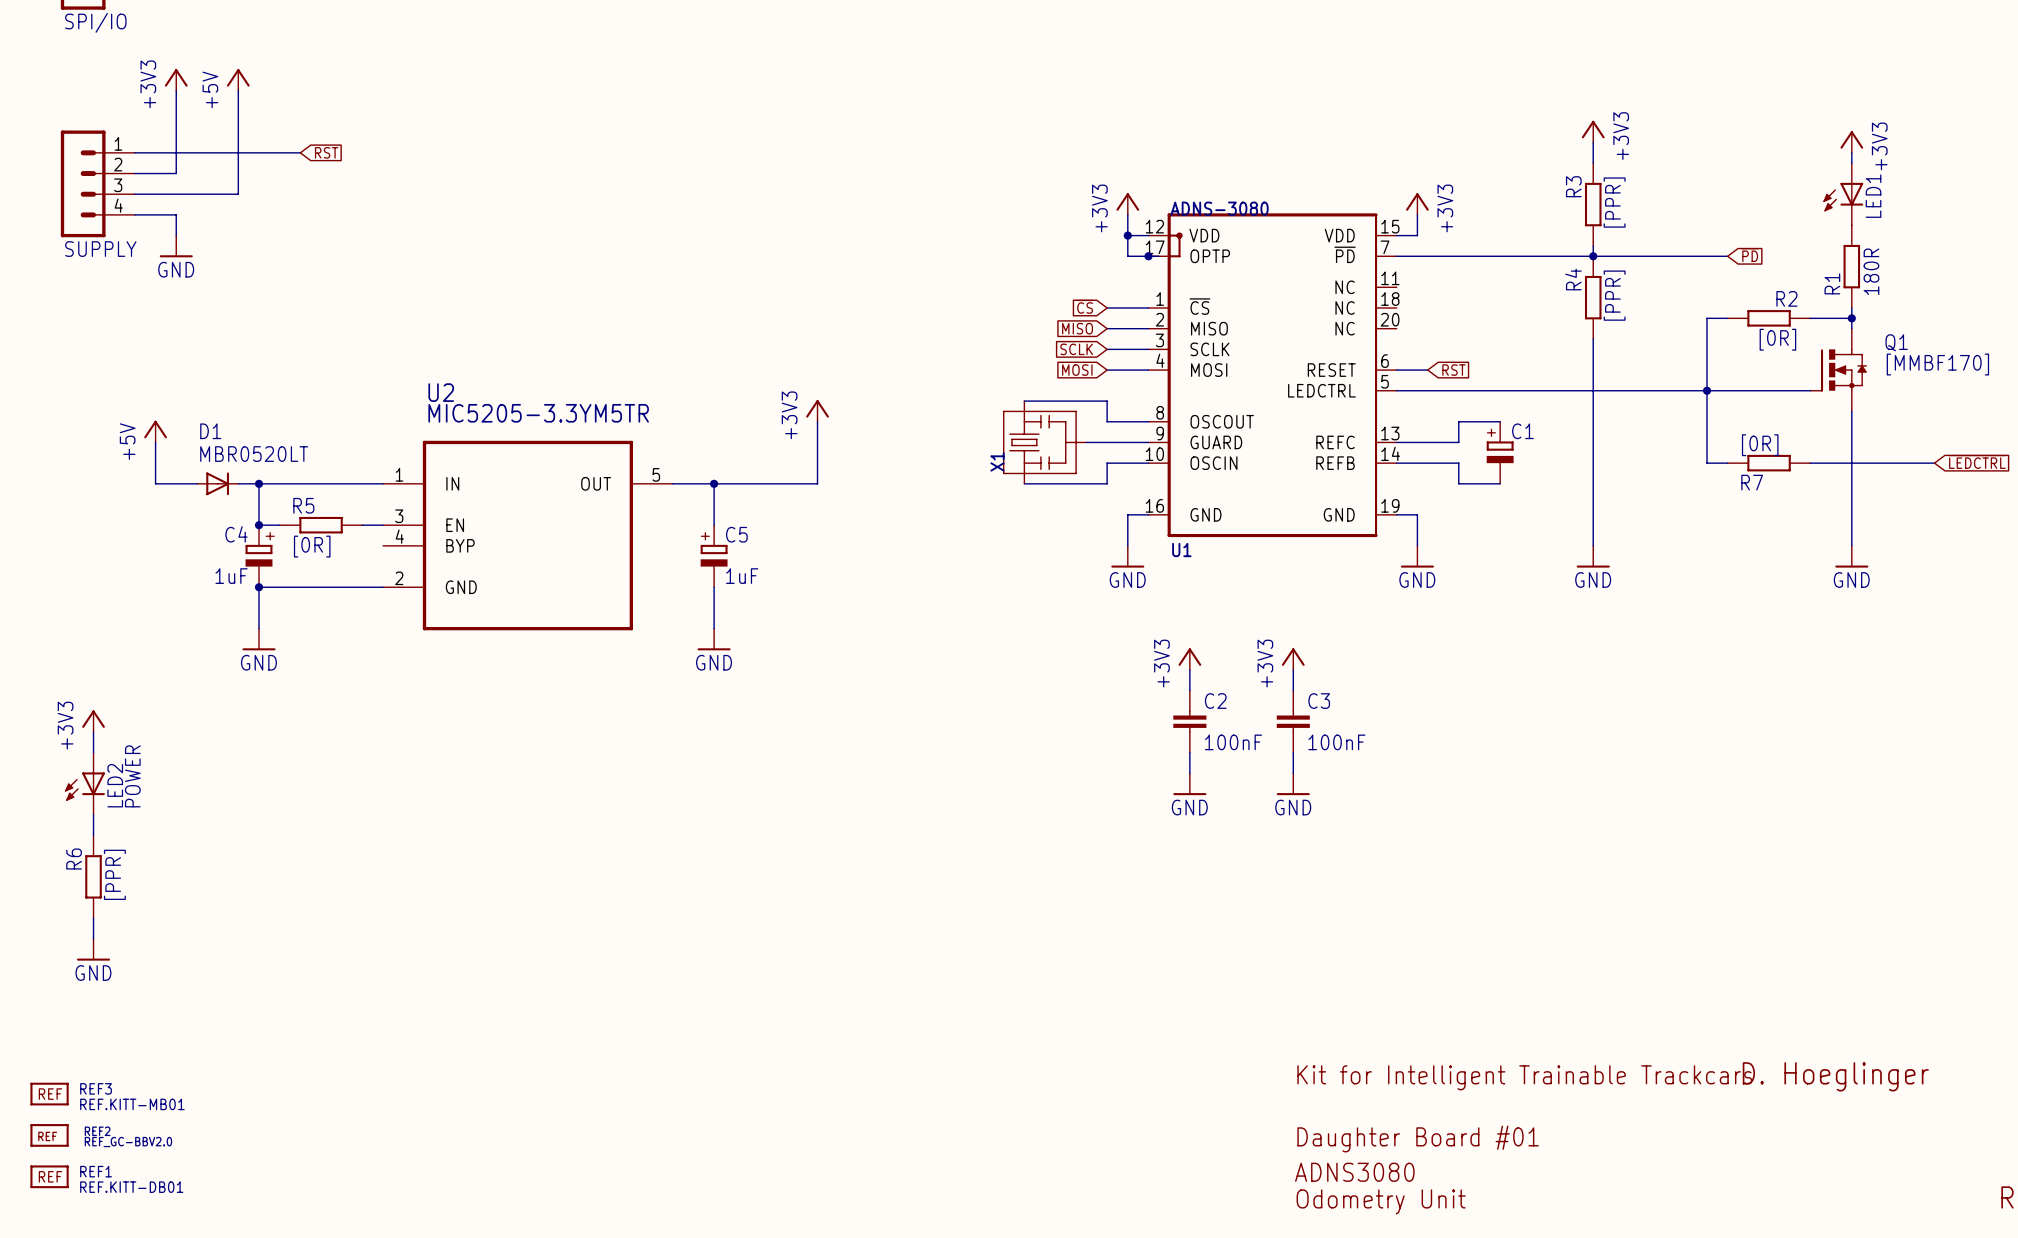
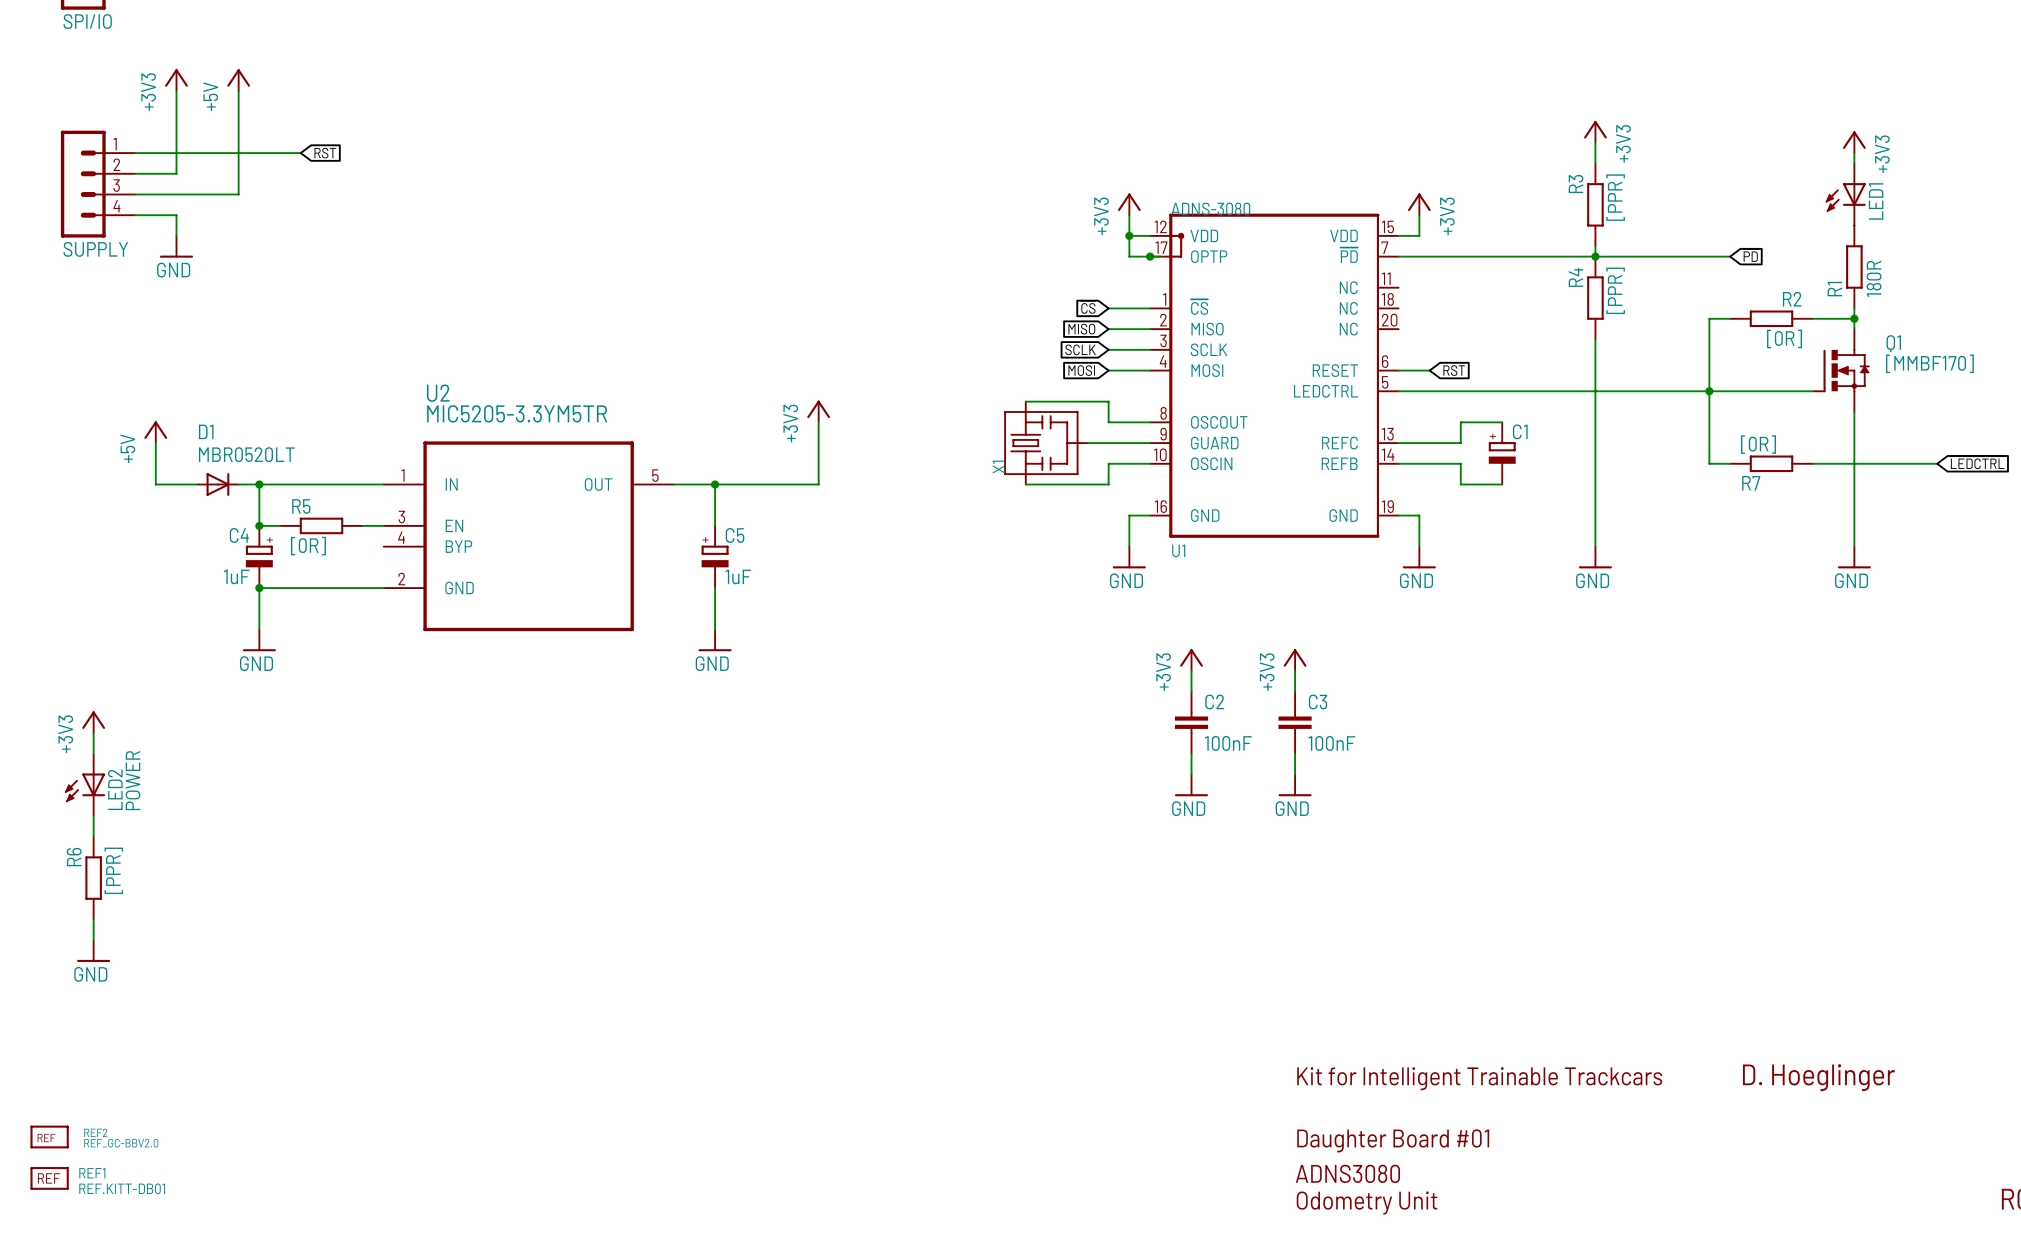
REF3: REF.KITT-MB01 (49, 1094) -> none

